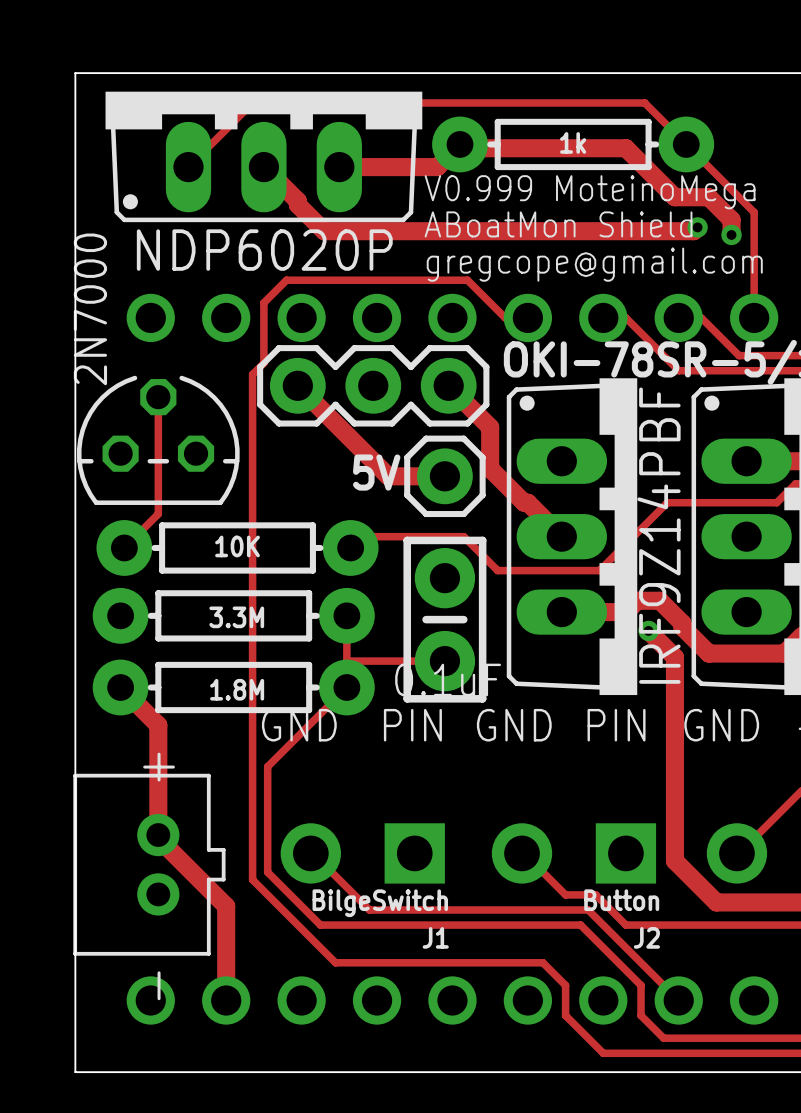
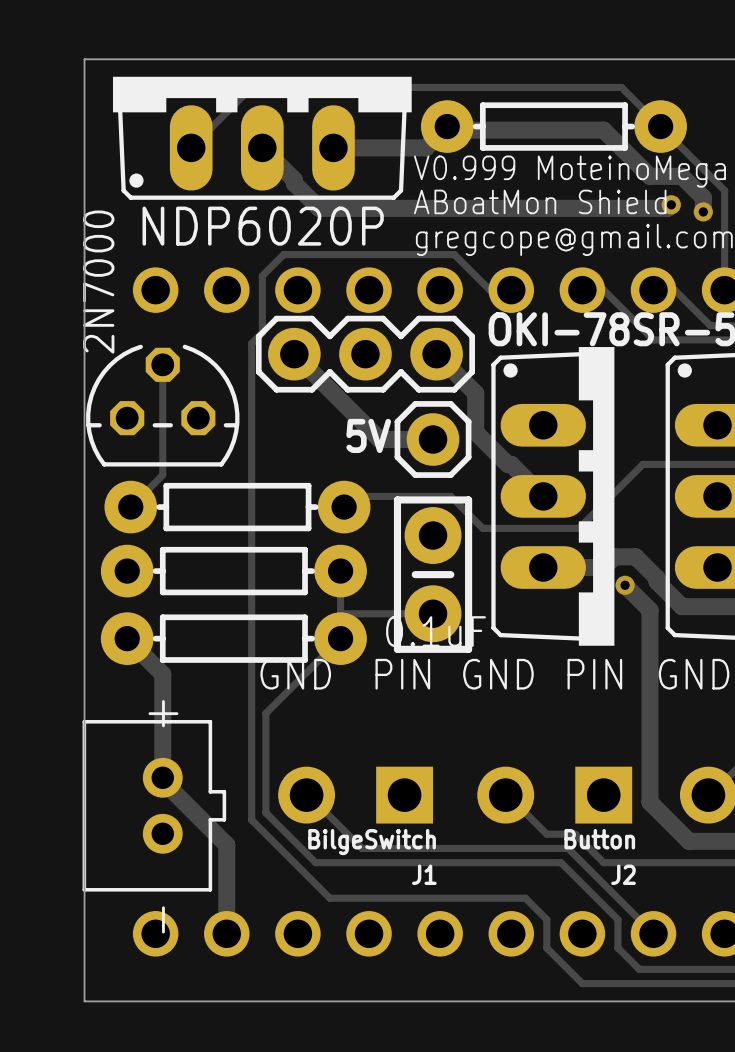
part value: 1k (573, 142) -> none
part value: IRF9Z14PBF (658, 535) -> none
part value: 10K (237, 546) -> none
part value: 3.3M (236, 617) -> none
part value: 1.8M (237, 689) -> none

